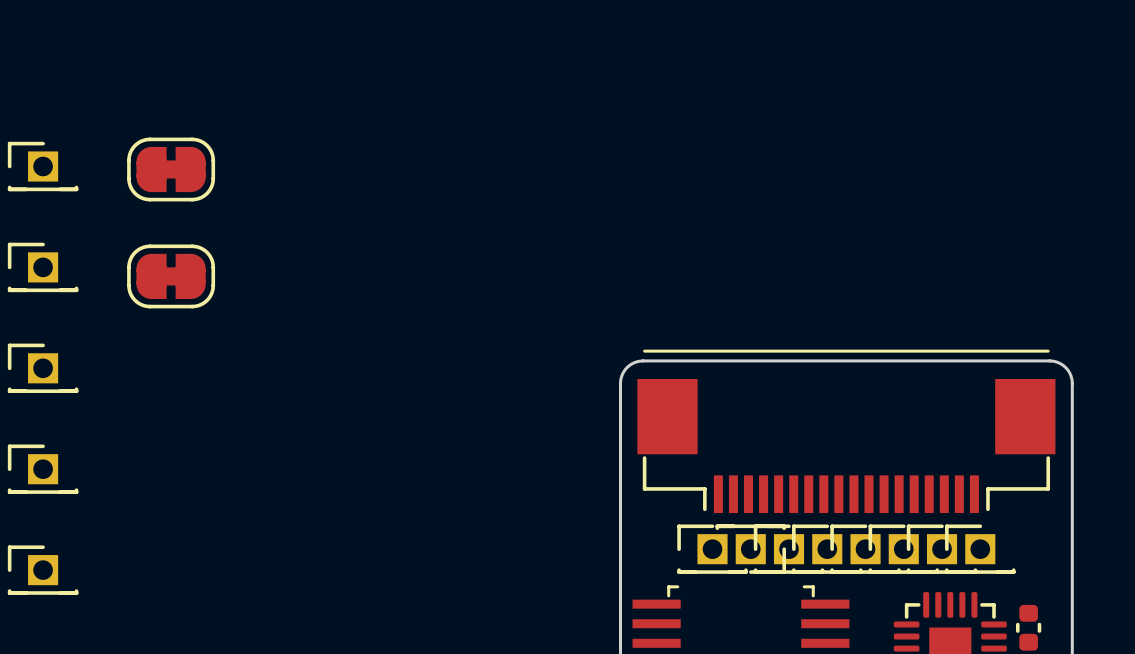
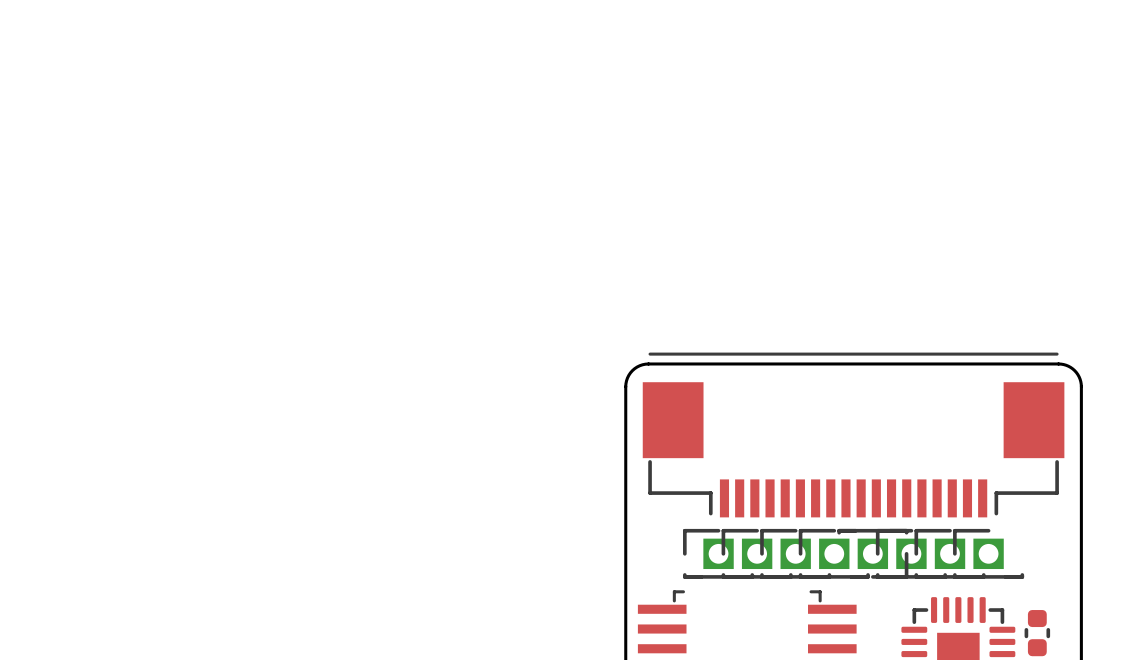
part: (43, 166) -> none
part: (171, 169) -> none
part: (43, 267) -> none
part: (171, 276) -> none
part: (43, 368) -> none
part: (43, 469) -> none
part rotation: 0° (750, 549) -> 180° (757, 553)
part rotation: 0° (865, 549) -> 180° (872, 553)
part: (43, 570) -> none

